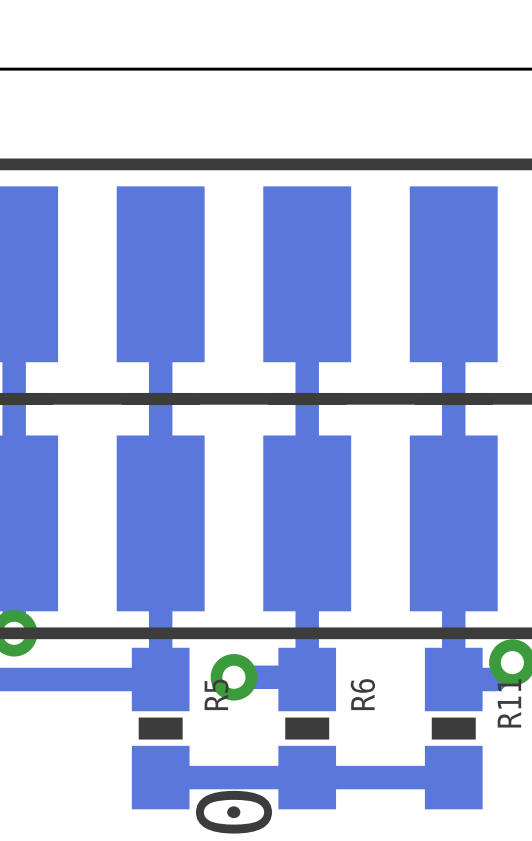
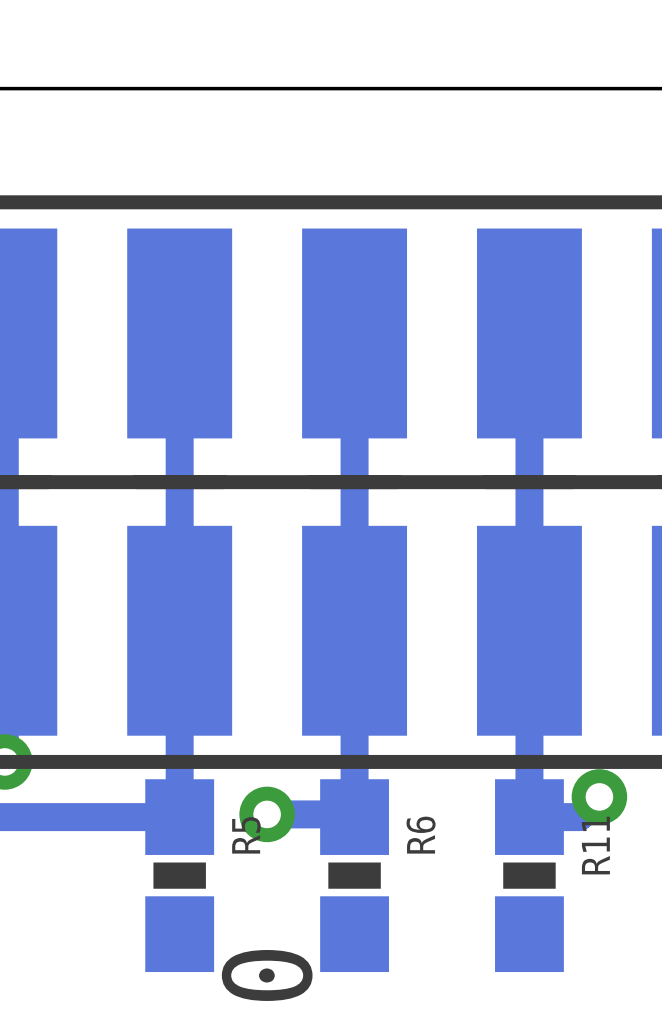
track: (453, 777) (160, 777) -> none

